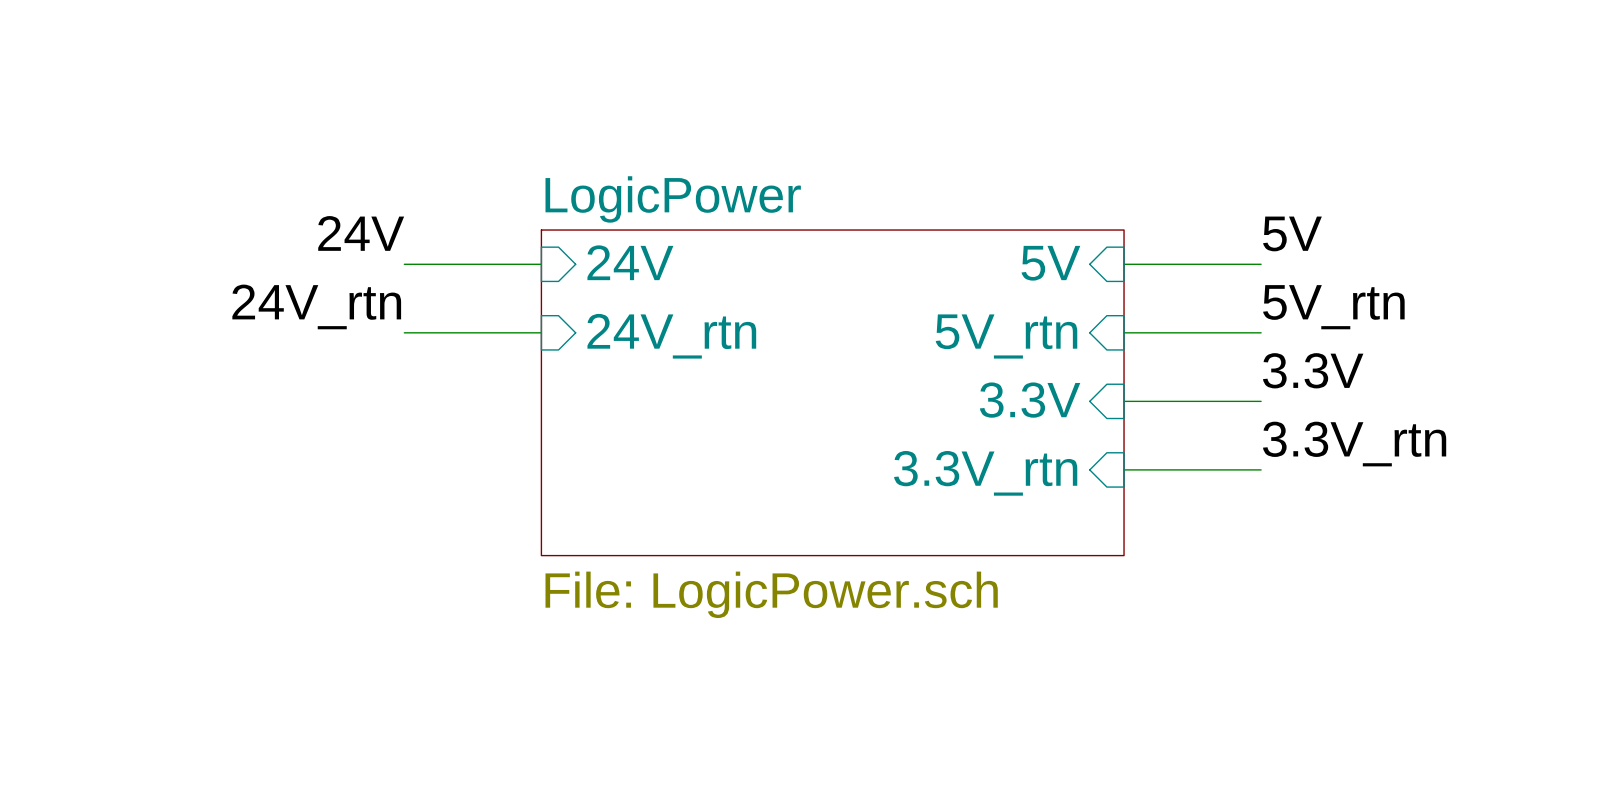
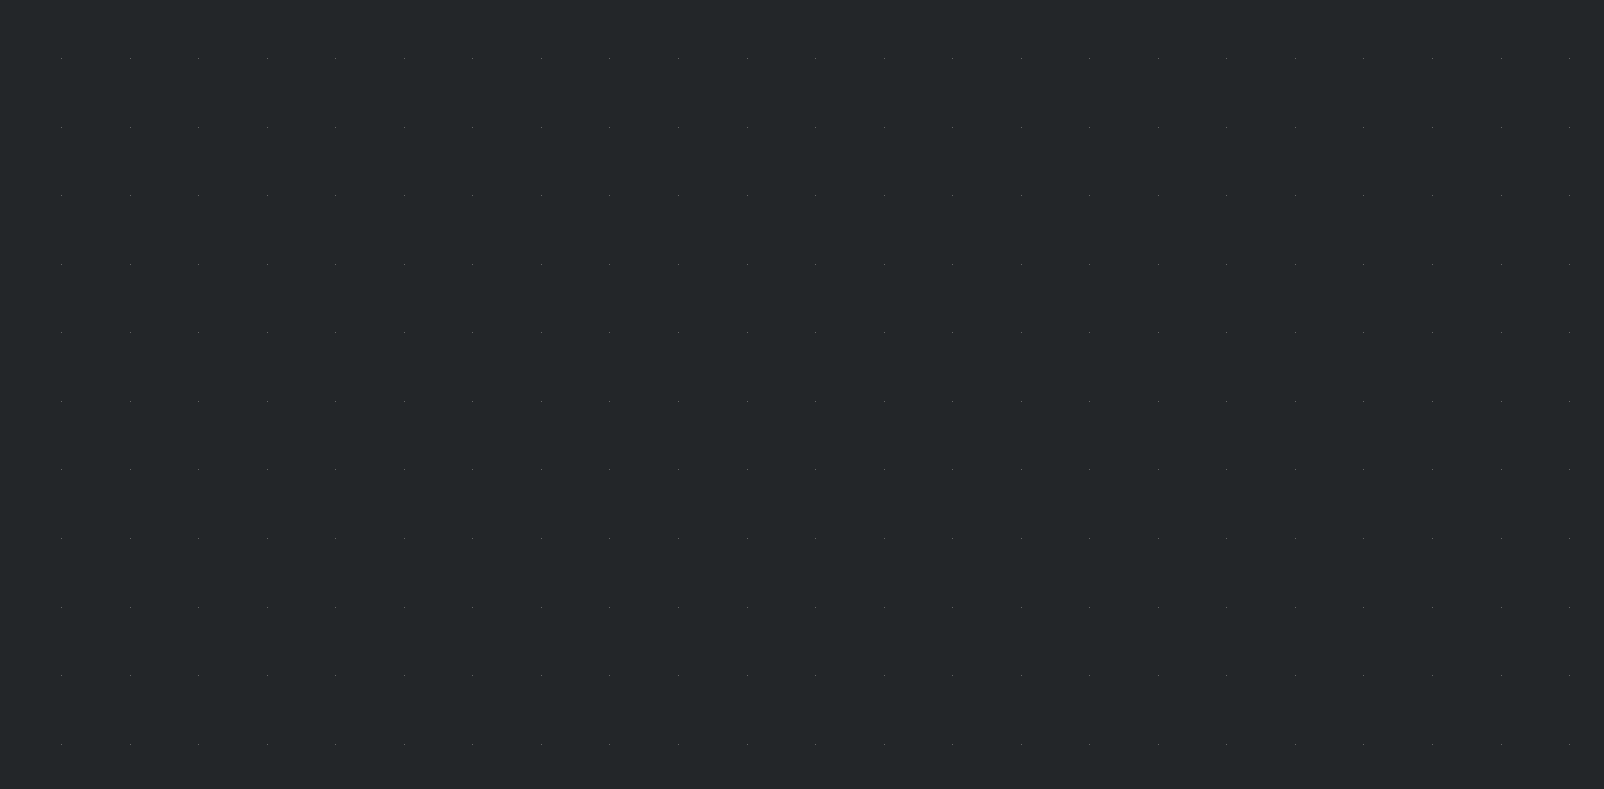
label: 24V (361, 233) -> none
label: 5V (1292, 233) -> none
sheet pin: 24V (630, 262) -> none
sheet pin: 5V (1050, 263) -> none
wire: (404, 264) (541, 264) -> none
wire: (1124, 264) (1261, 264) -> none
label: 24V_rtn (316, 306) -> none
label: 5V_rtn (1333, 307) -> none
wire: (404, 332) (541, 332) -> none
wire: (1124, 332) (1261, 332) -> none
sheet pin: 24V_rtn (671, 336) -> none
sheet pin: 5V_rtn (1006, 336) -> none
label: 3.3V (1313, 370) -> none
sheet LogicPower: File: LogicPower.sch (832, 392) -> none
sheet pin: 3.3V (1030, 400) -> none
wire: (1124, 401) (1261, 401) -> none
label: 3.3V_rtn (1354, 444) -> none
wire: (1124, 469) (1261, 469) -> none
sheet pin: 3.3V_rtn (985, 473) -> none

